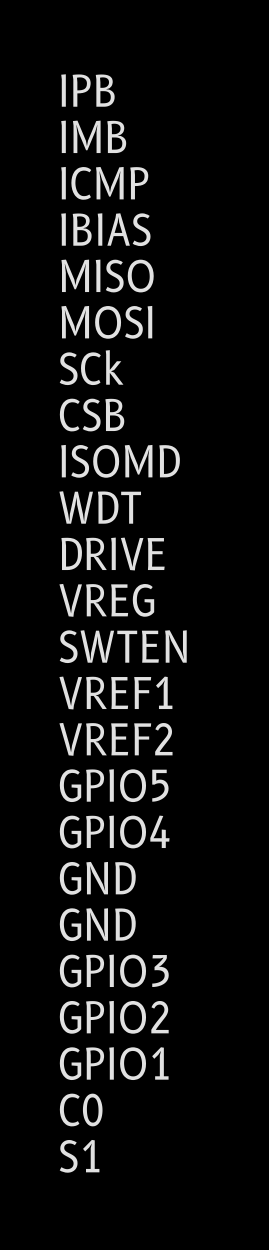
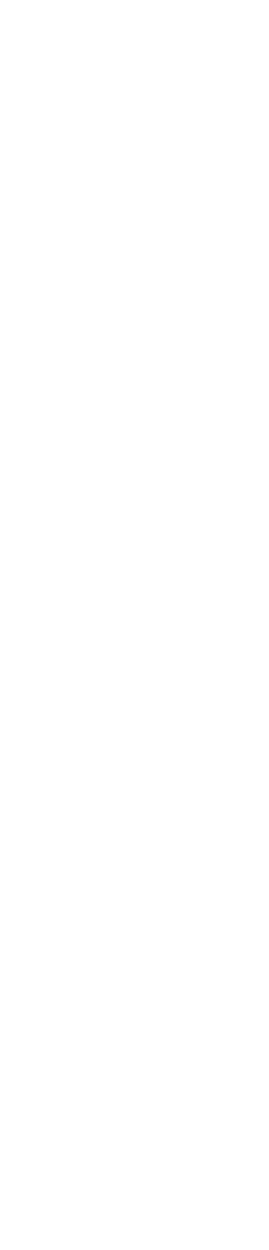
text: IPB (87, 90) -> none
text: IMB (93, 136) -> none
text: ICMP (104, 183) -> none
text: IBIAS (105, 229) -> none
text: MISO (107, 276) -> none
text: MOSI (106, 322) -> none
text: SCk (91, 367) -> none
text: CSB (92, 415) -> none
text: ISOMD (120, 461) -> none
text: WDT (100, 507) -> none
text: DRIVE (113, 554) -> none
text: VREG (106, 600) -> none
text: SWTEN (123, 646) -> none
text: VREF1 (115, 693) -> none
text: VREF2 (115, 739) -> none
text: GPIO5 (114, 785) -> none
text: GPIO4 (114, 831) -> none
text: GND (97, 878) -> none
text: GND (97, 924) -> none
text: GPIO3 (114, 970) -> none
text: GPIO2 (114, 1017) -> none
text: GPIO1 (114, 1063) -> none
text: C0 (81, 1110) -> none
text: S1 (79, 1156) -> none

